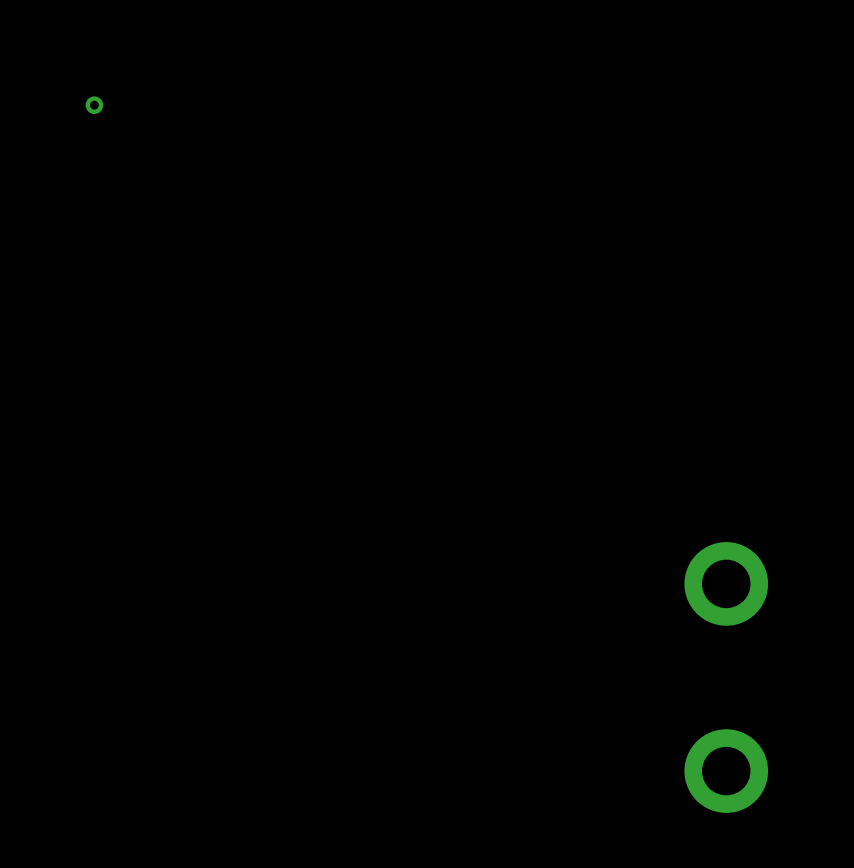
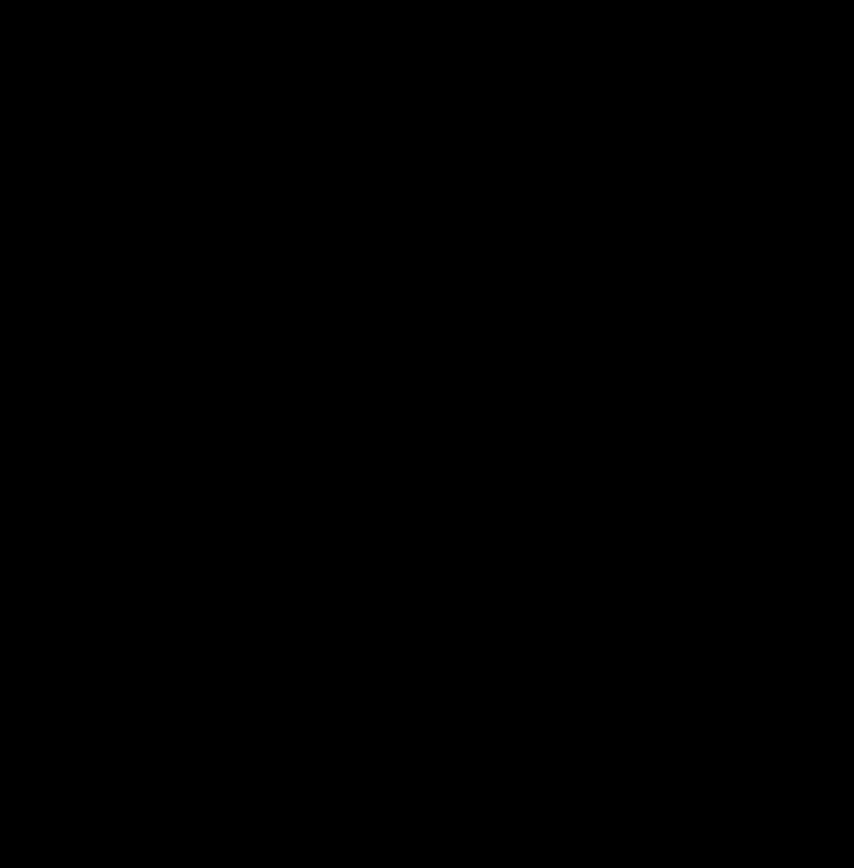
via: (94, 105) -> none
part: (726, 583) -> none
part: (726, 771) -> none

